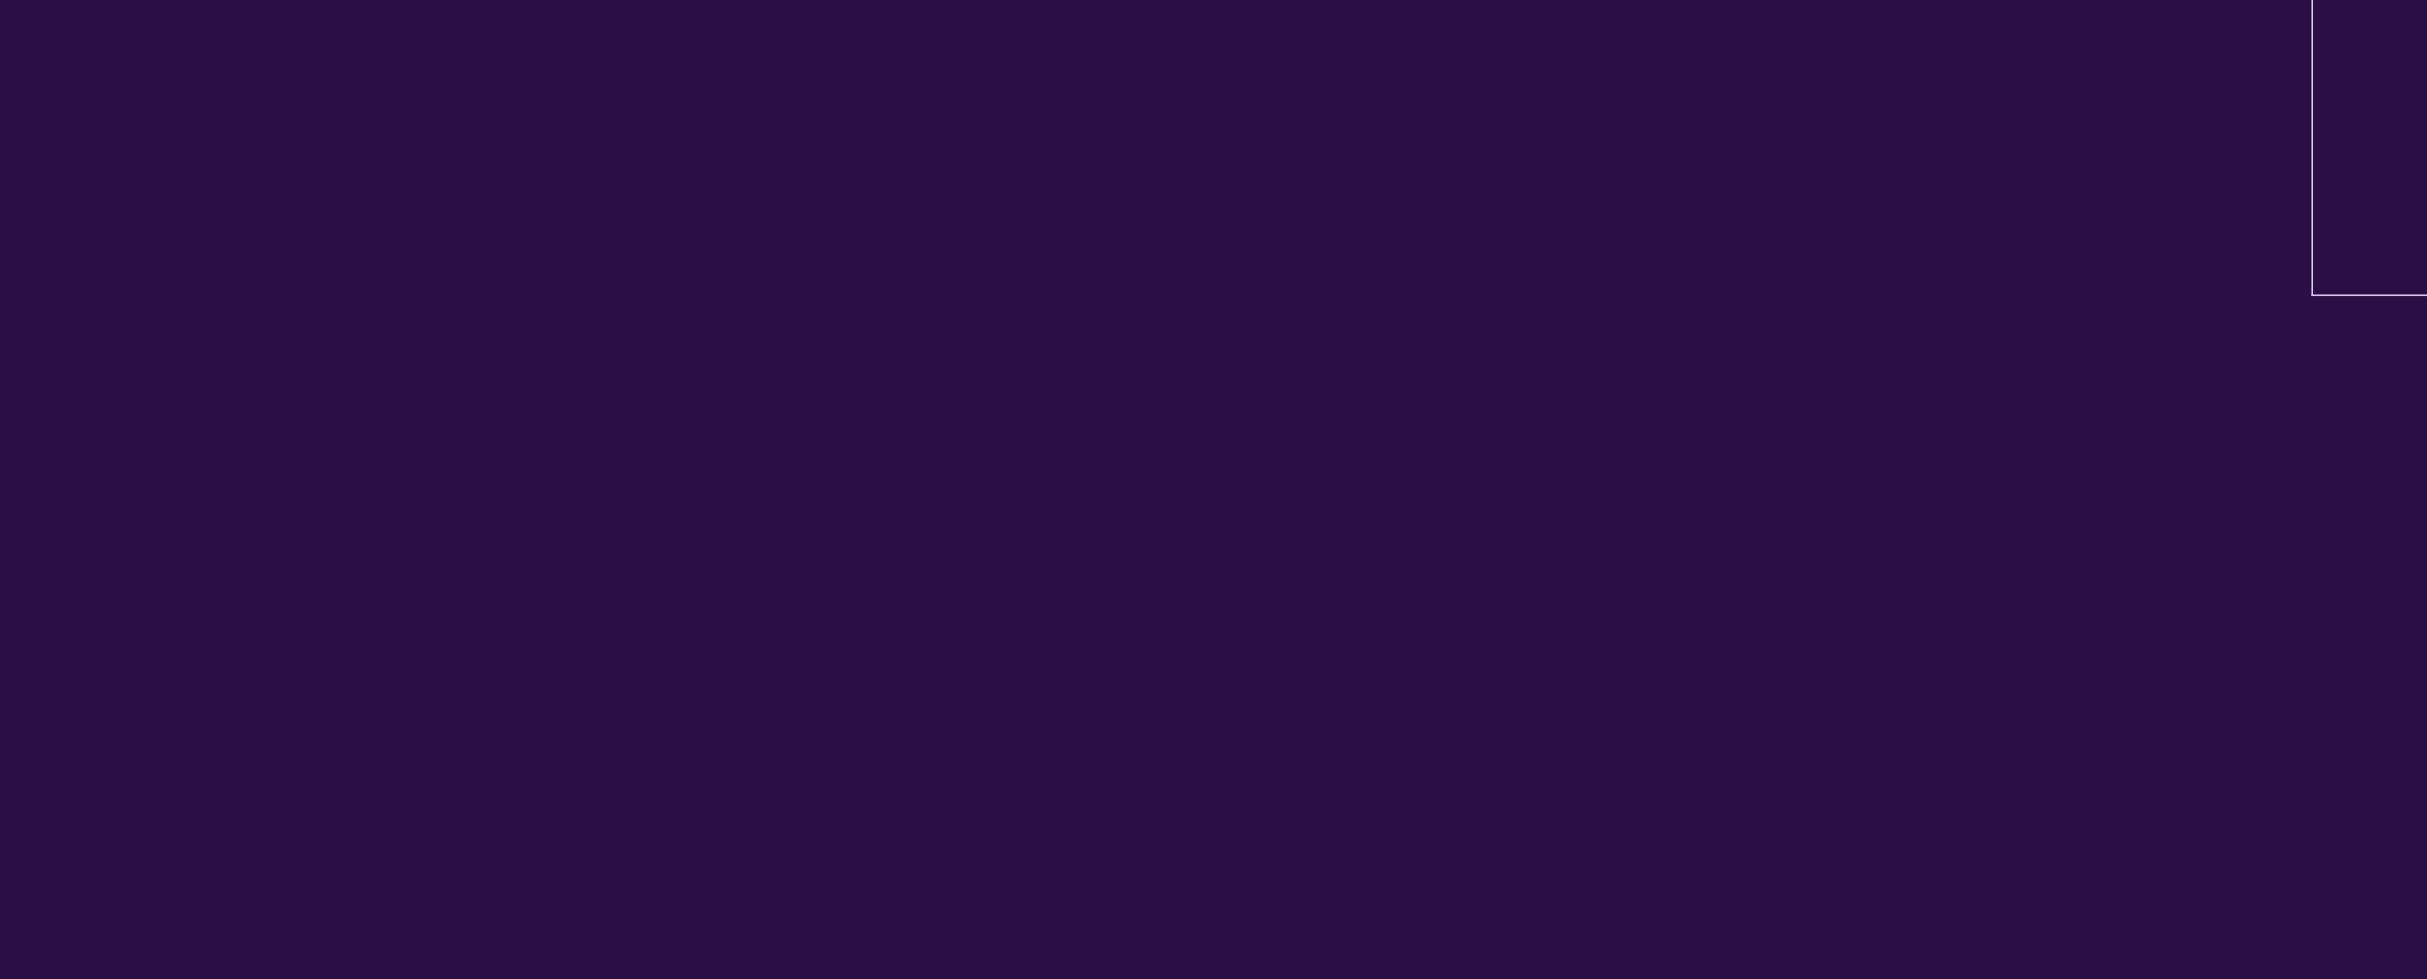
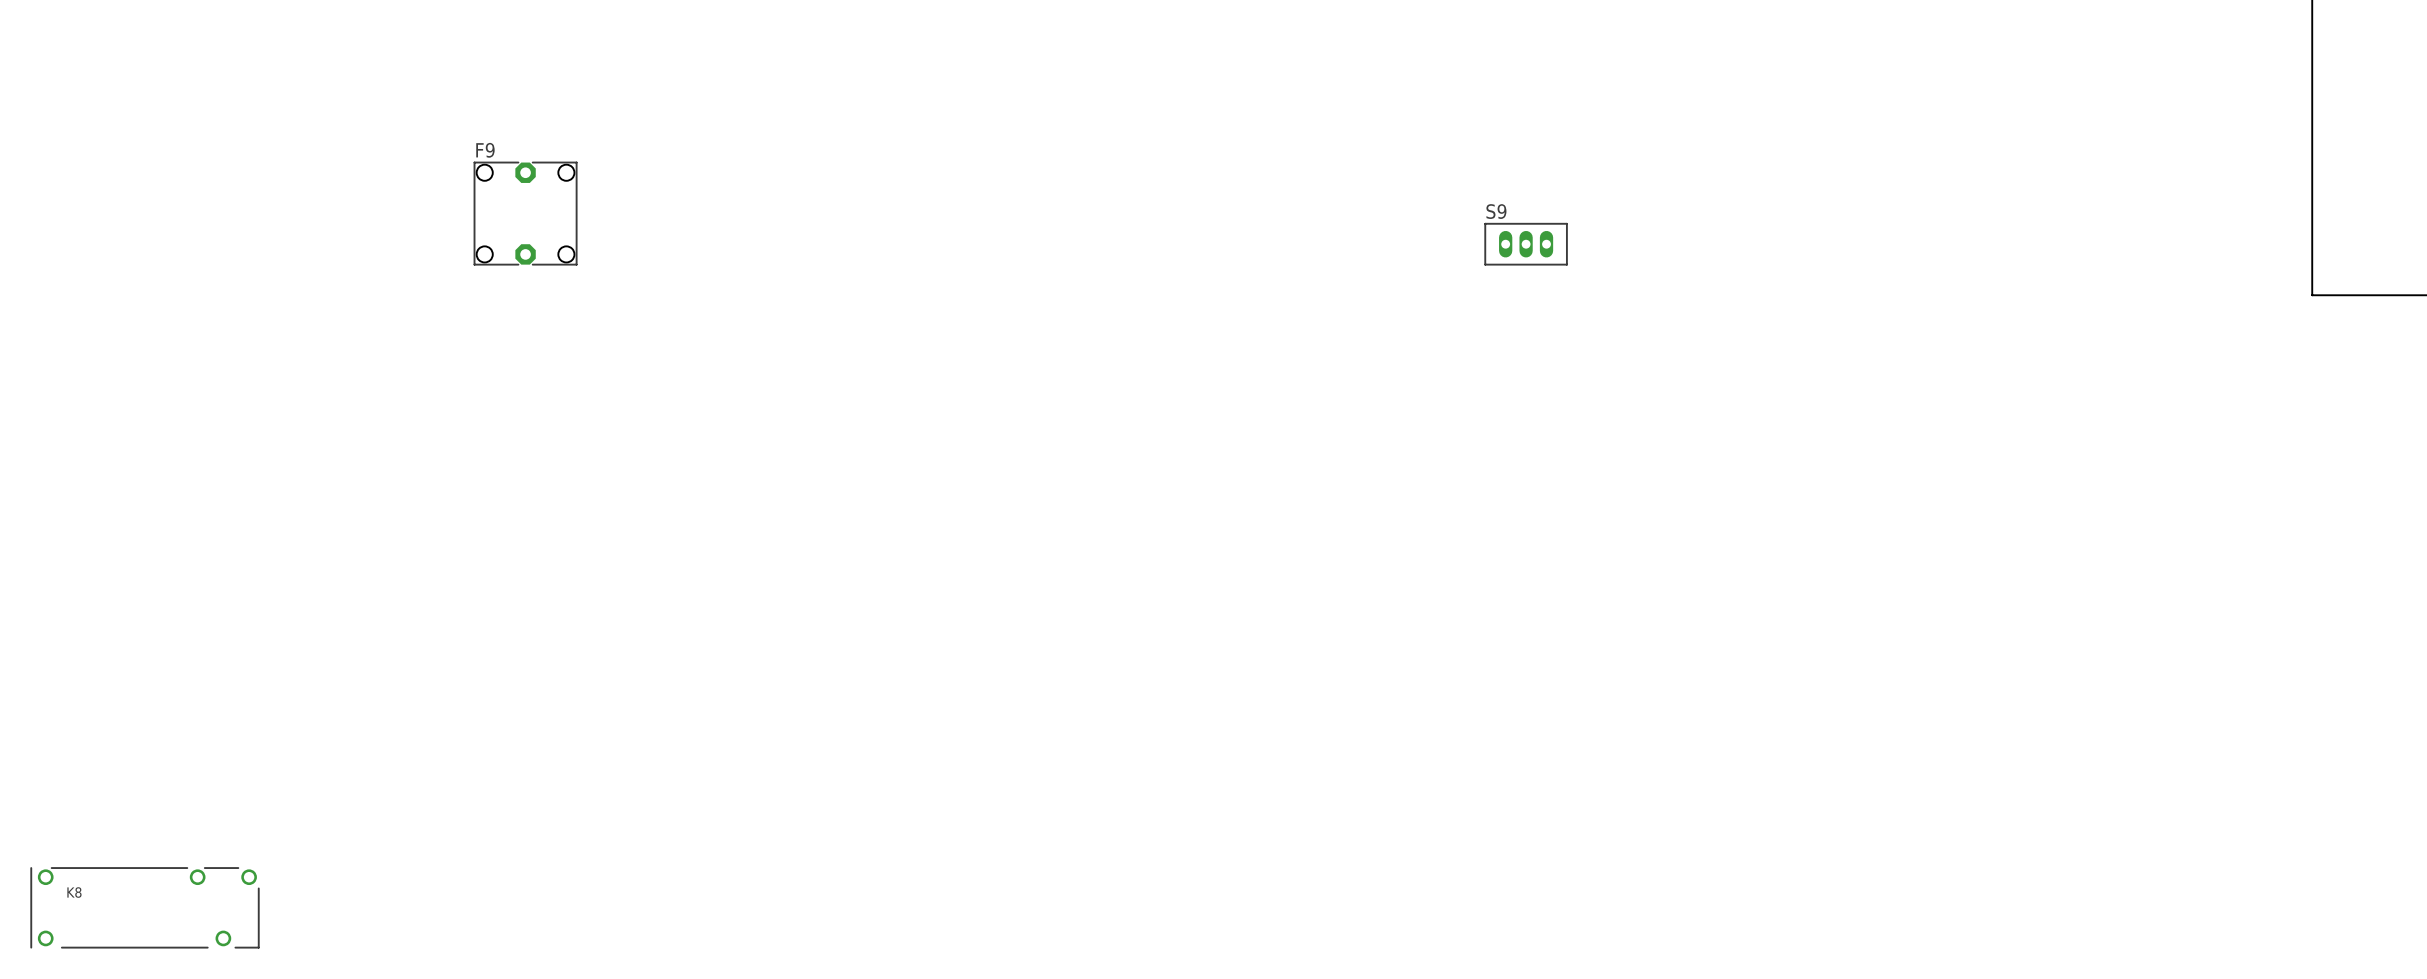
F9: none -> (525, 213)
S9: none -> (1526, 244)
K8: none -> (145, 907)

